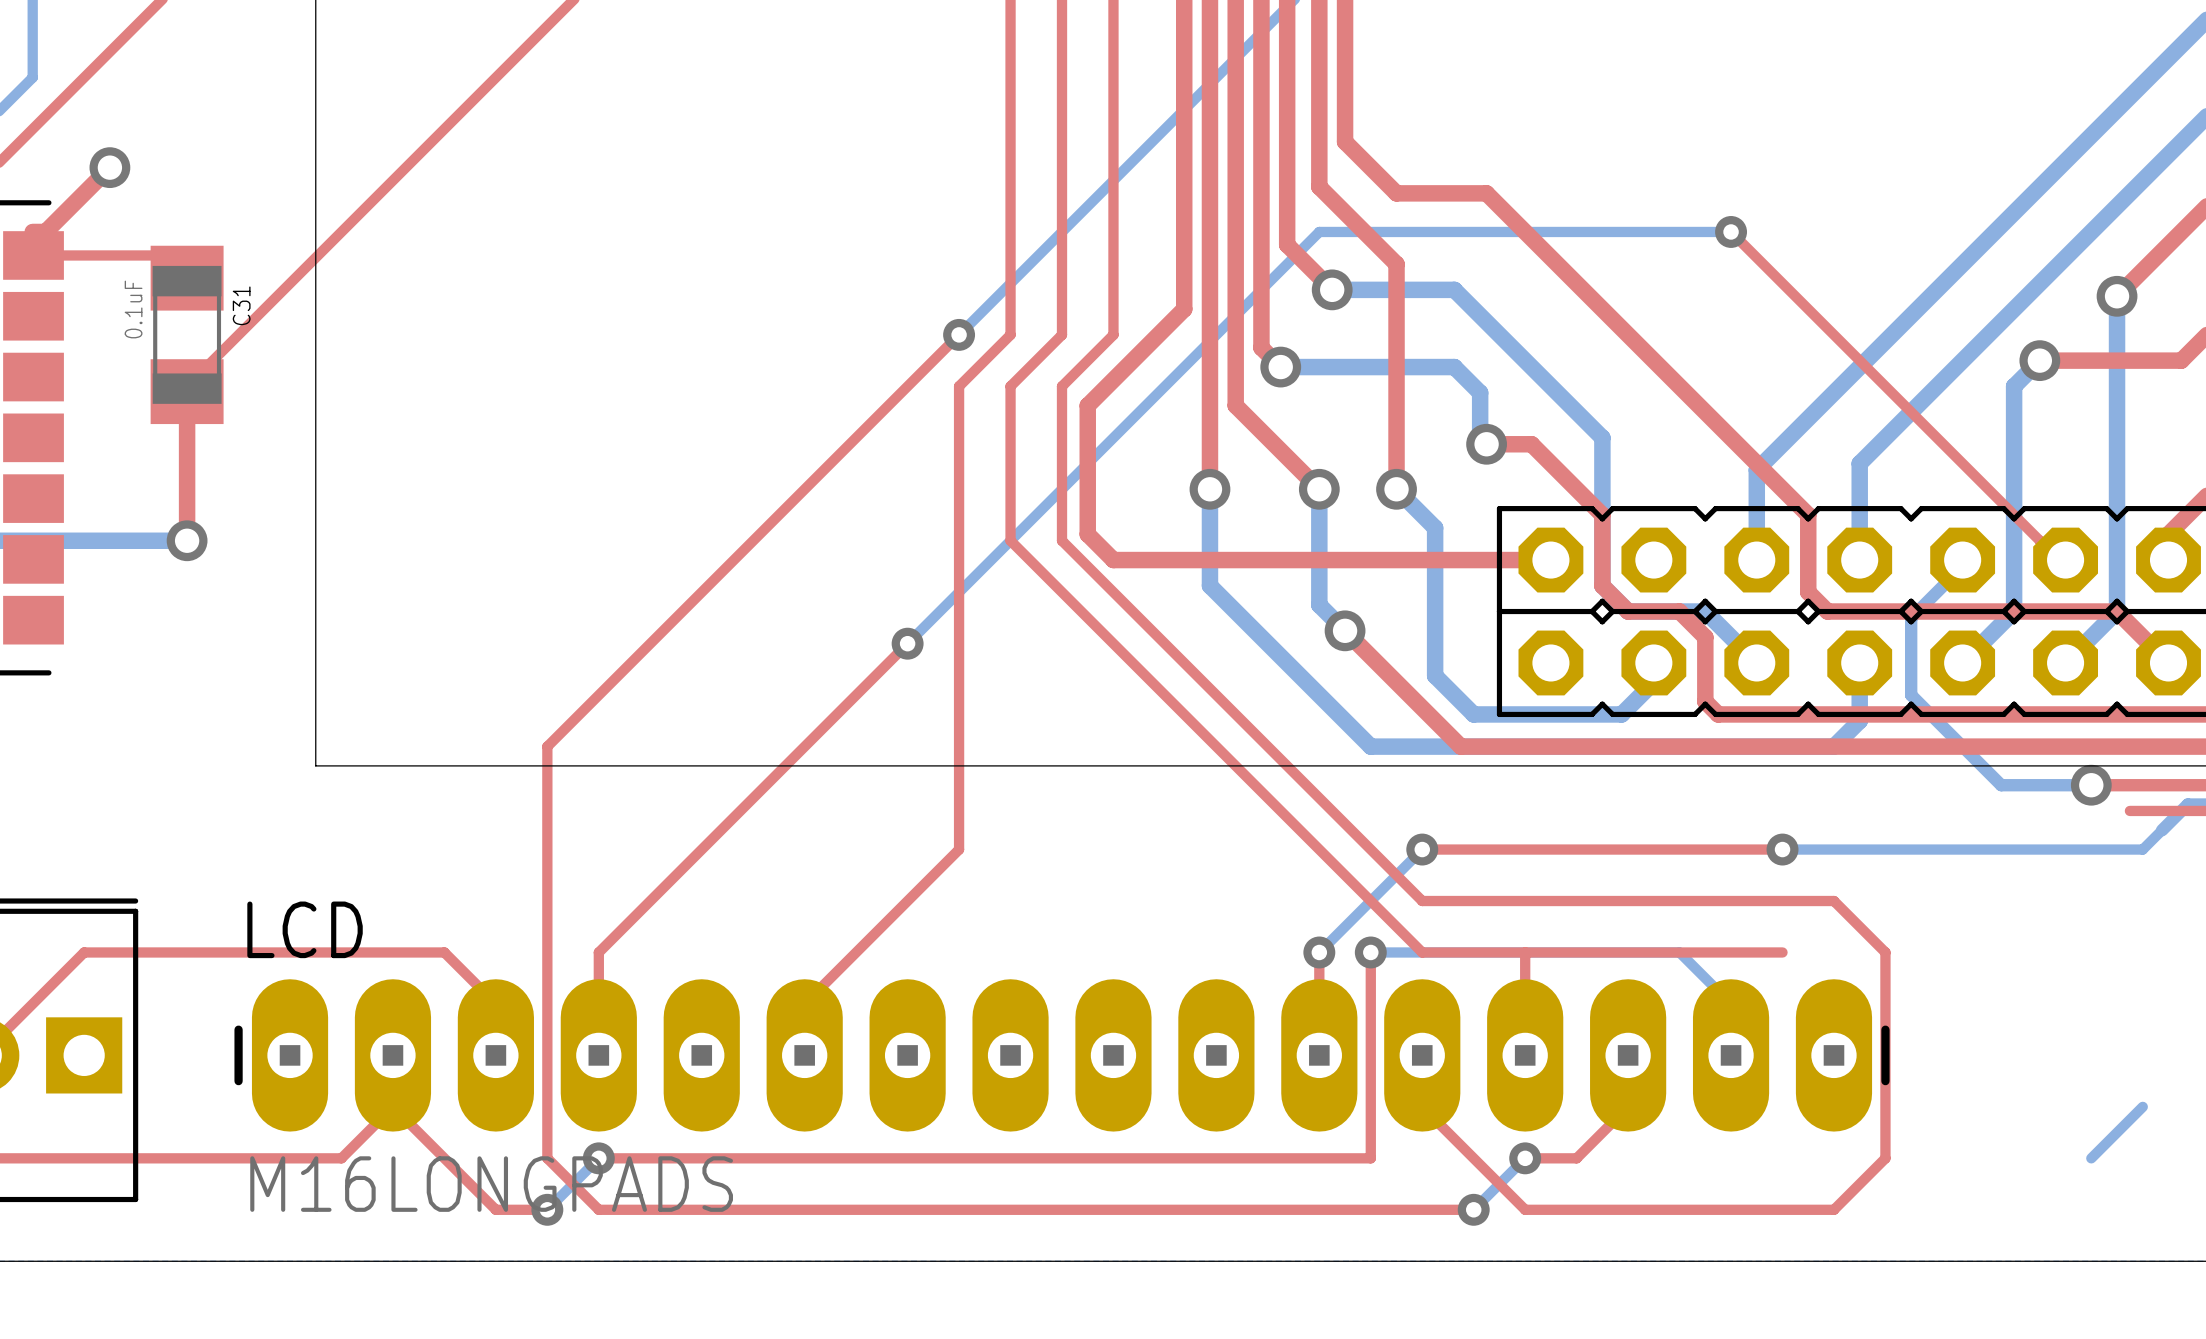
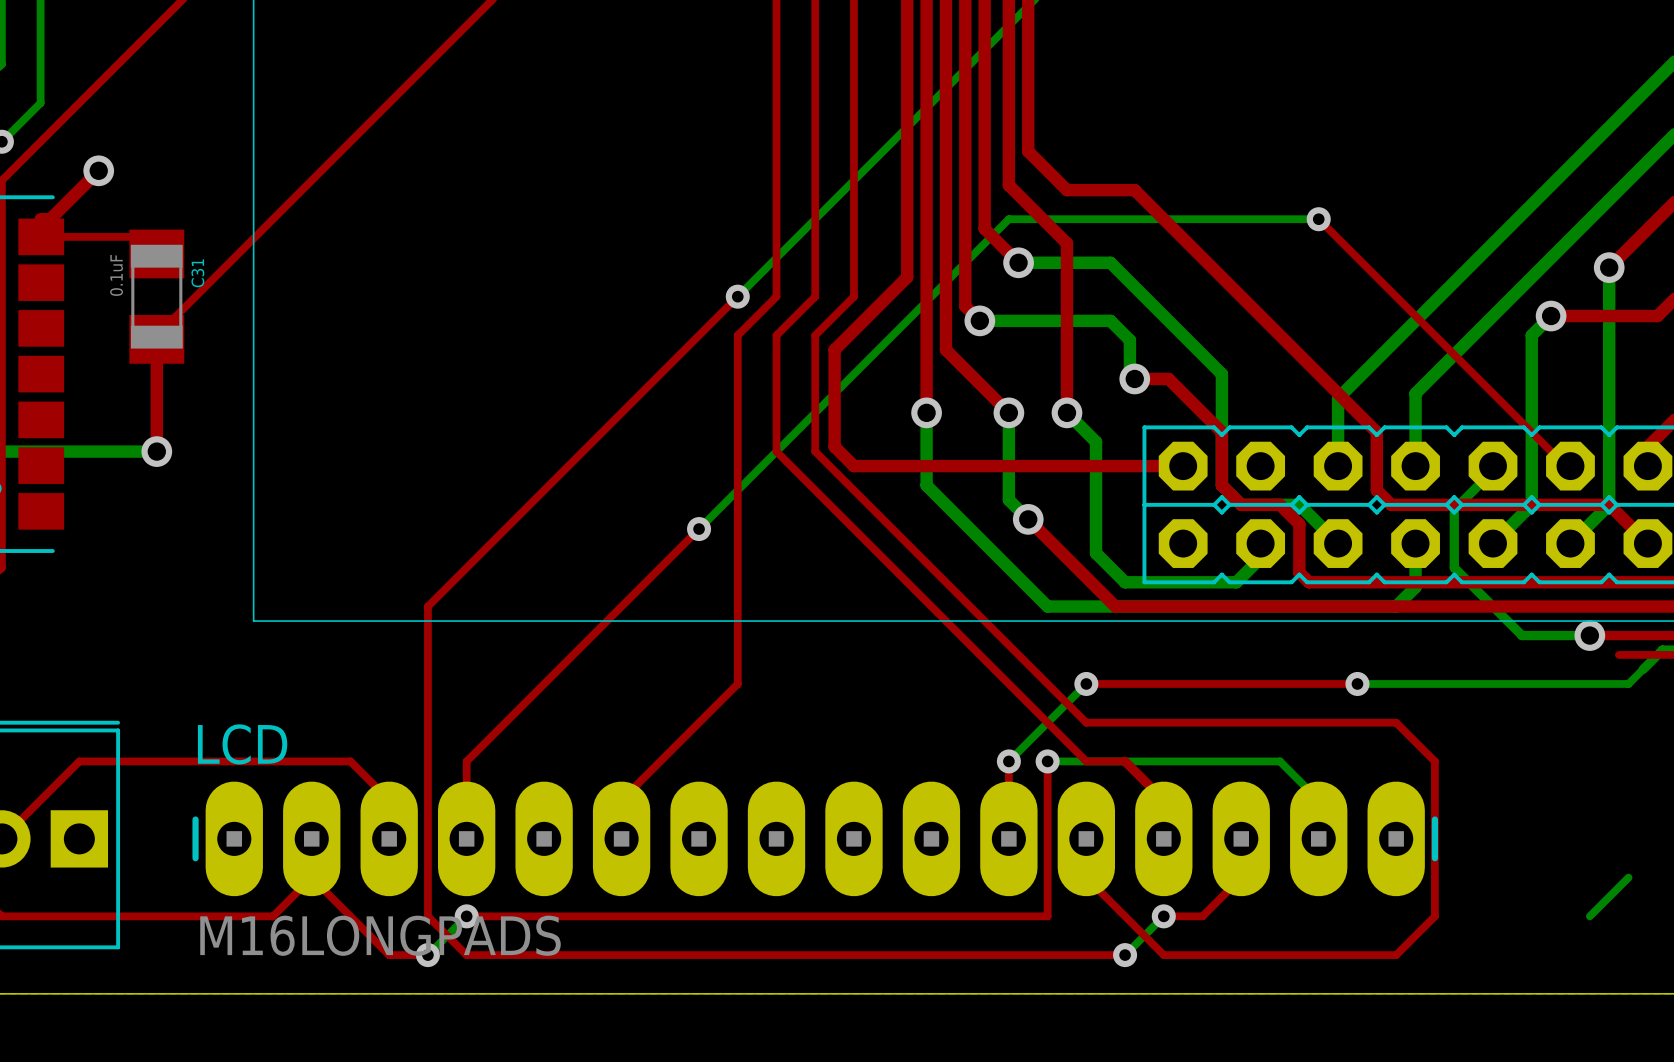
top track: (1473, 952) (1782, 952) -> none
top track: (1525, 952) (1525, 1003) -> (1125, 761) (1163, 800)

